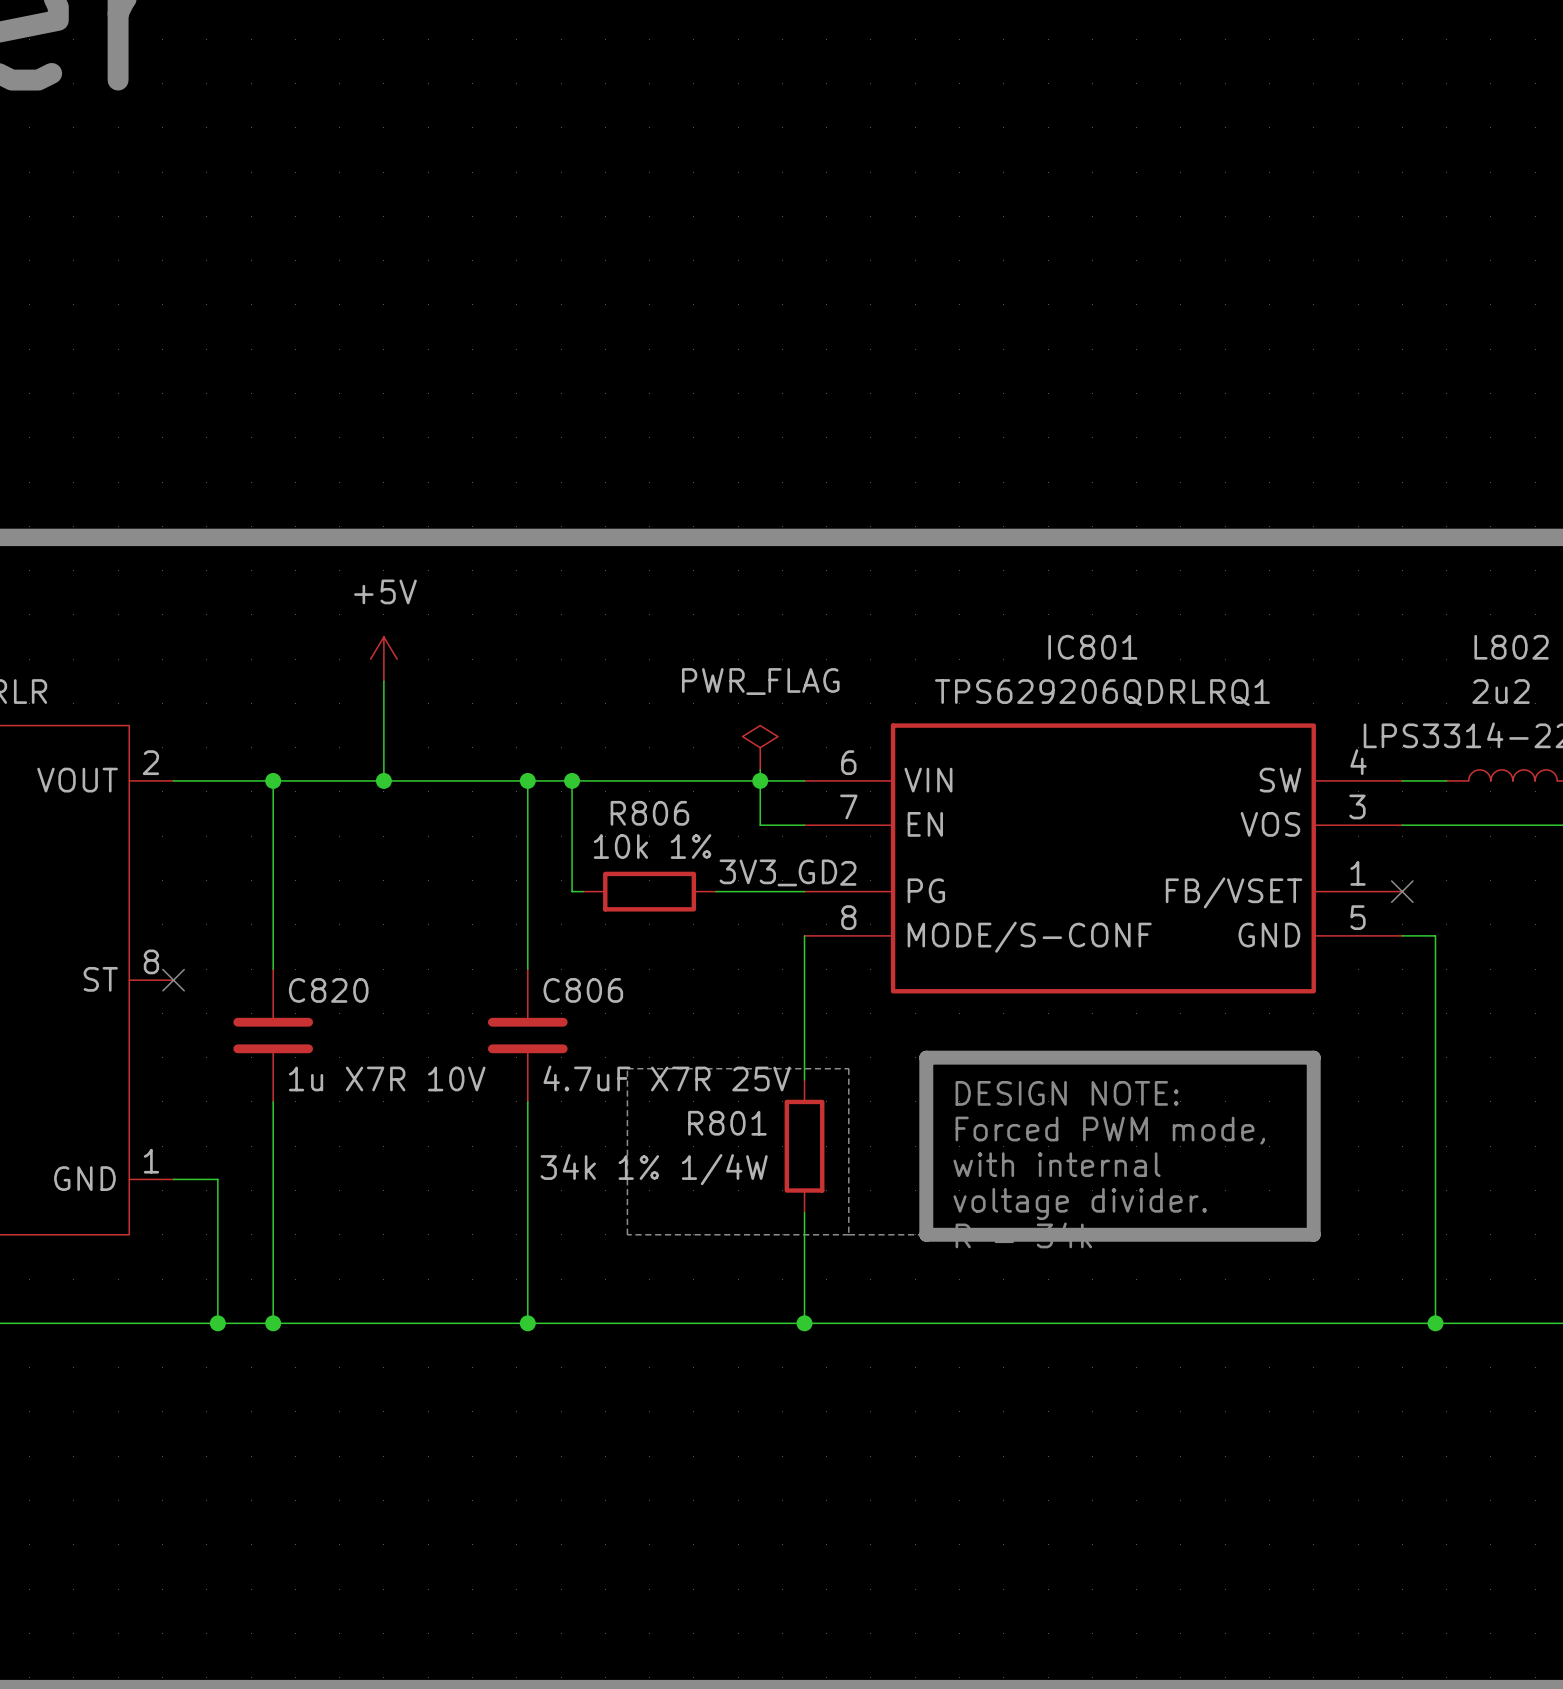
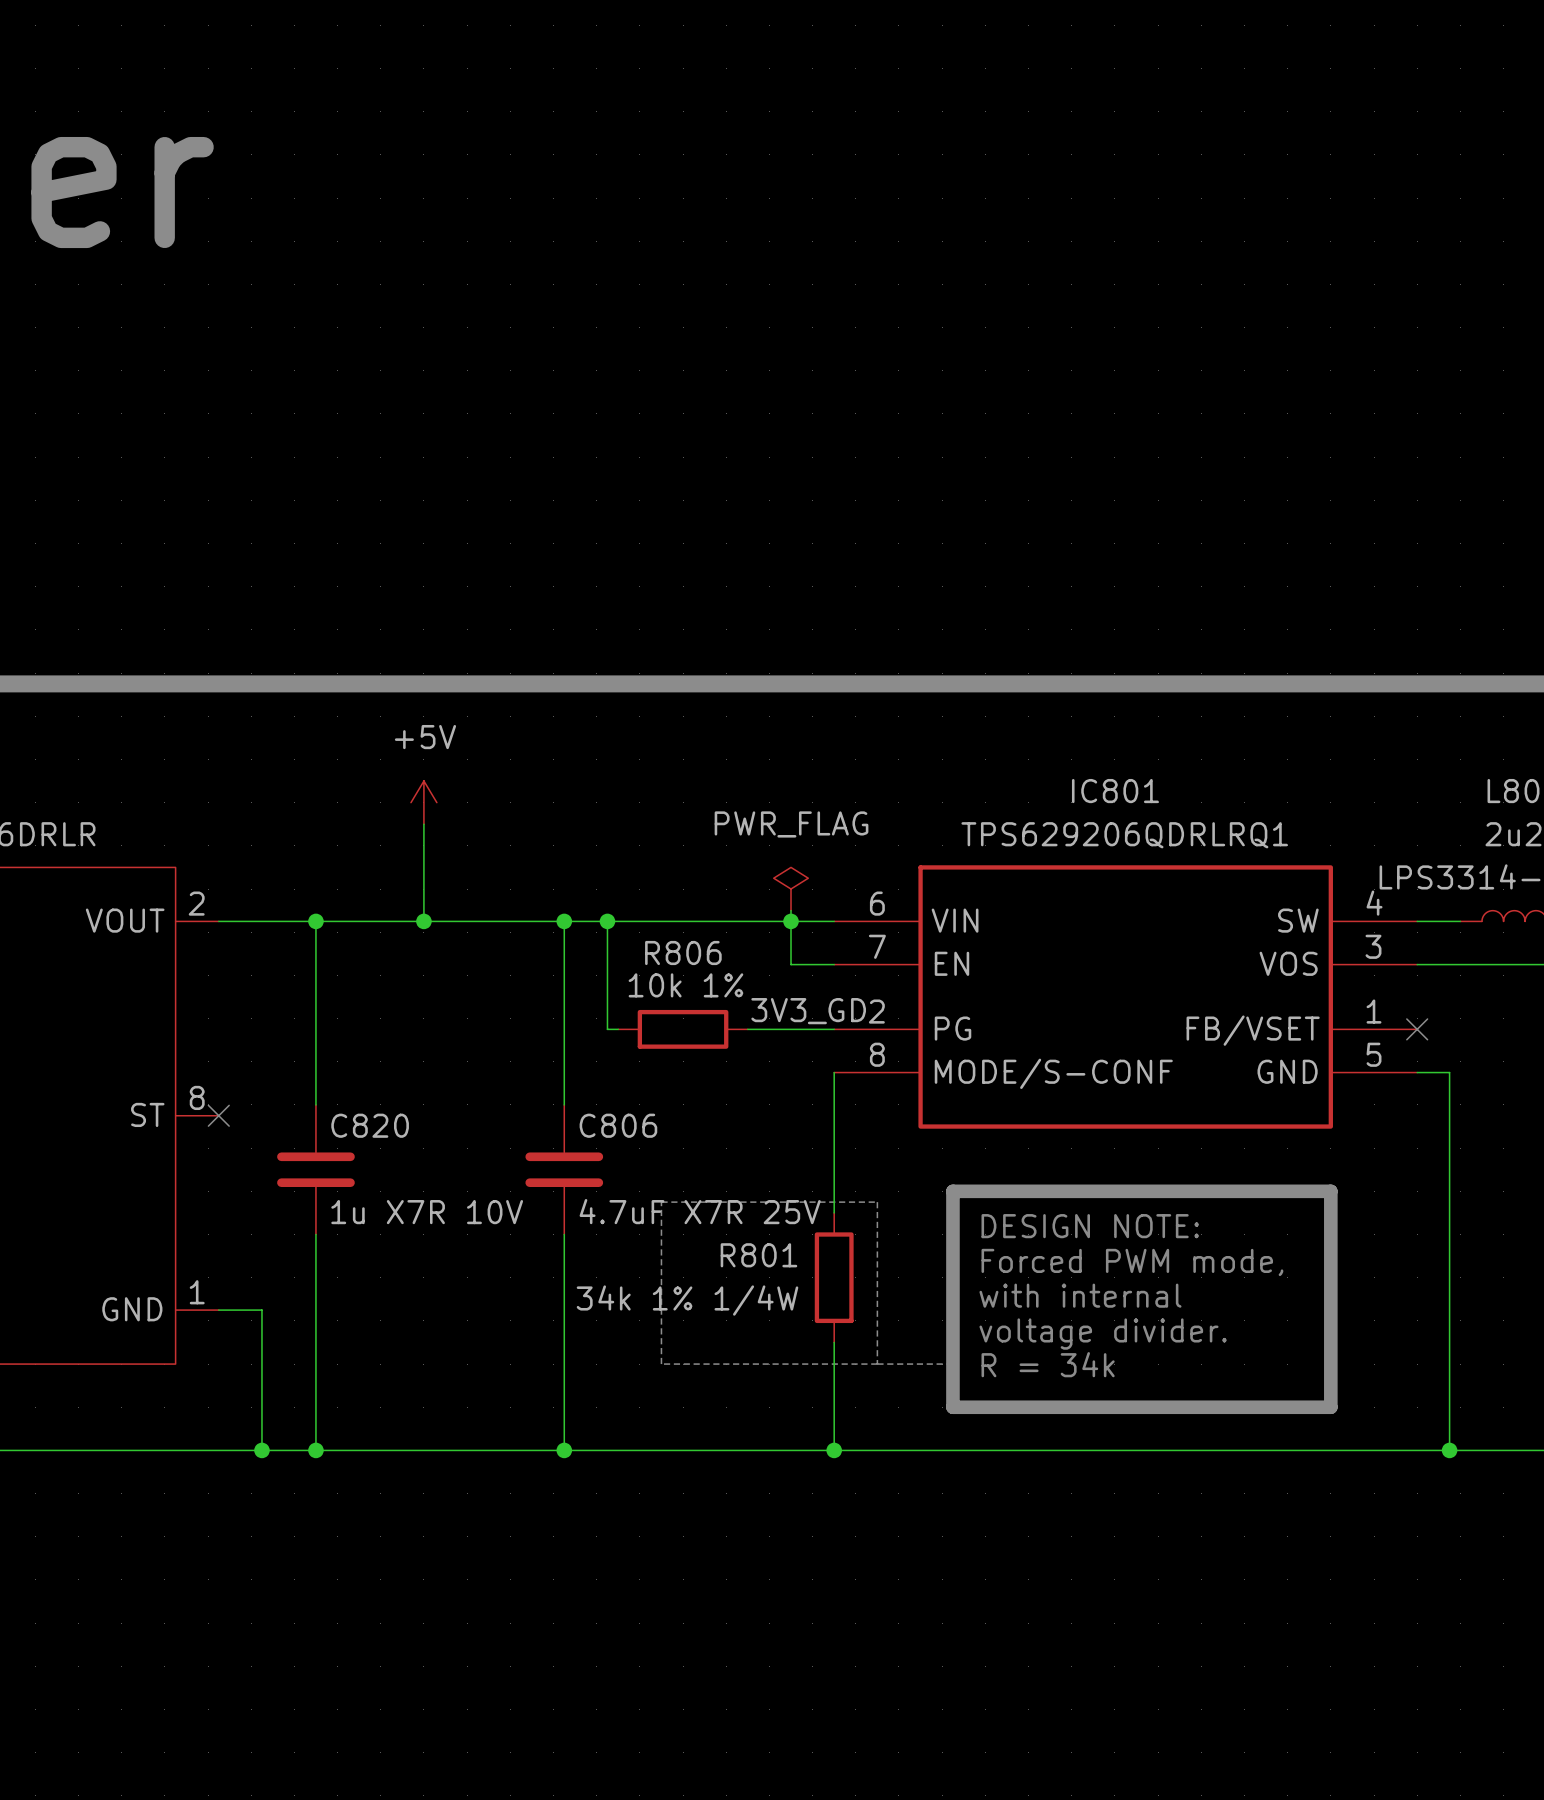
line: (926, 1234) (1313, 1234) -> (952, 1364) (952, 1407) (1330, 1407) (1330, 1364)

